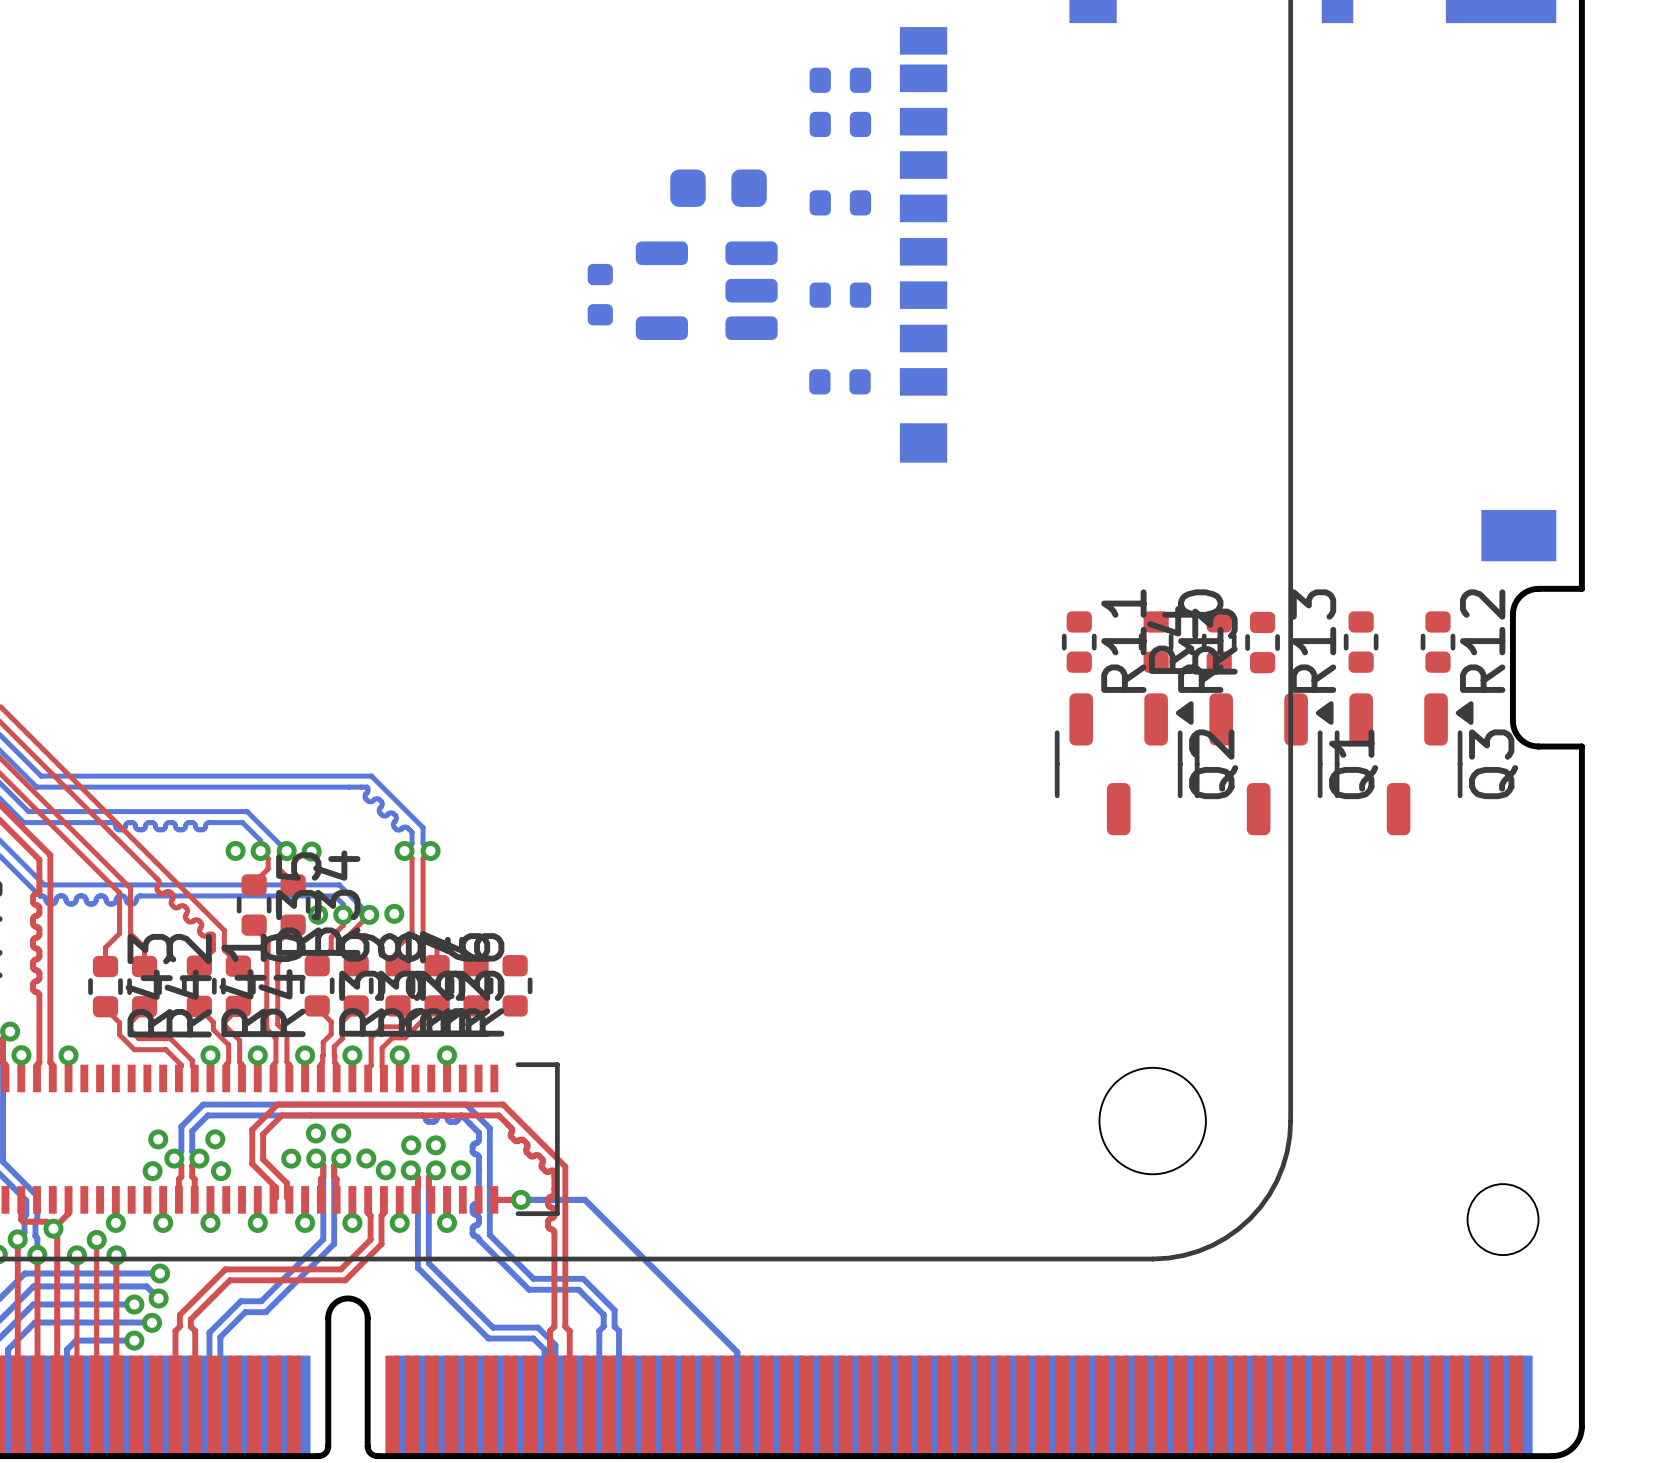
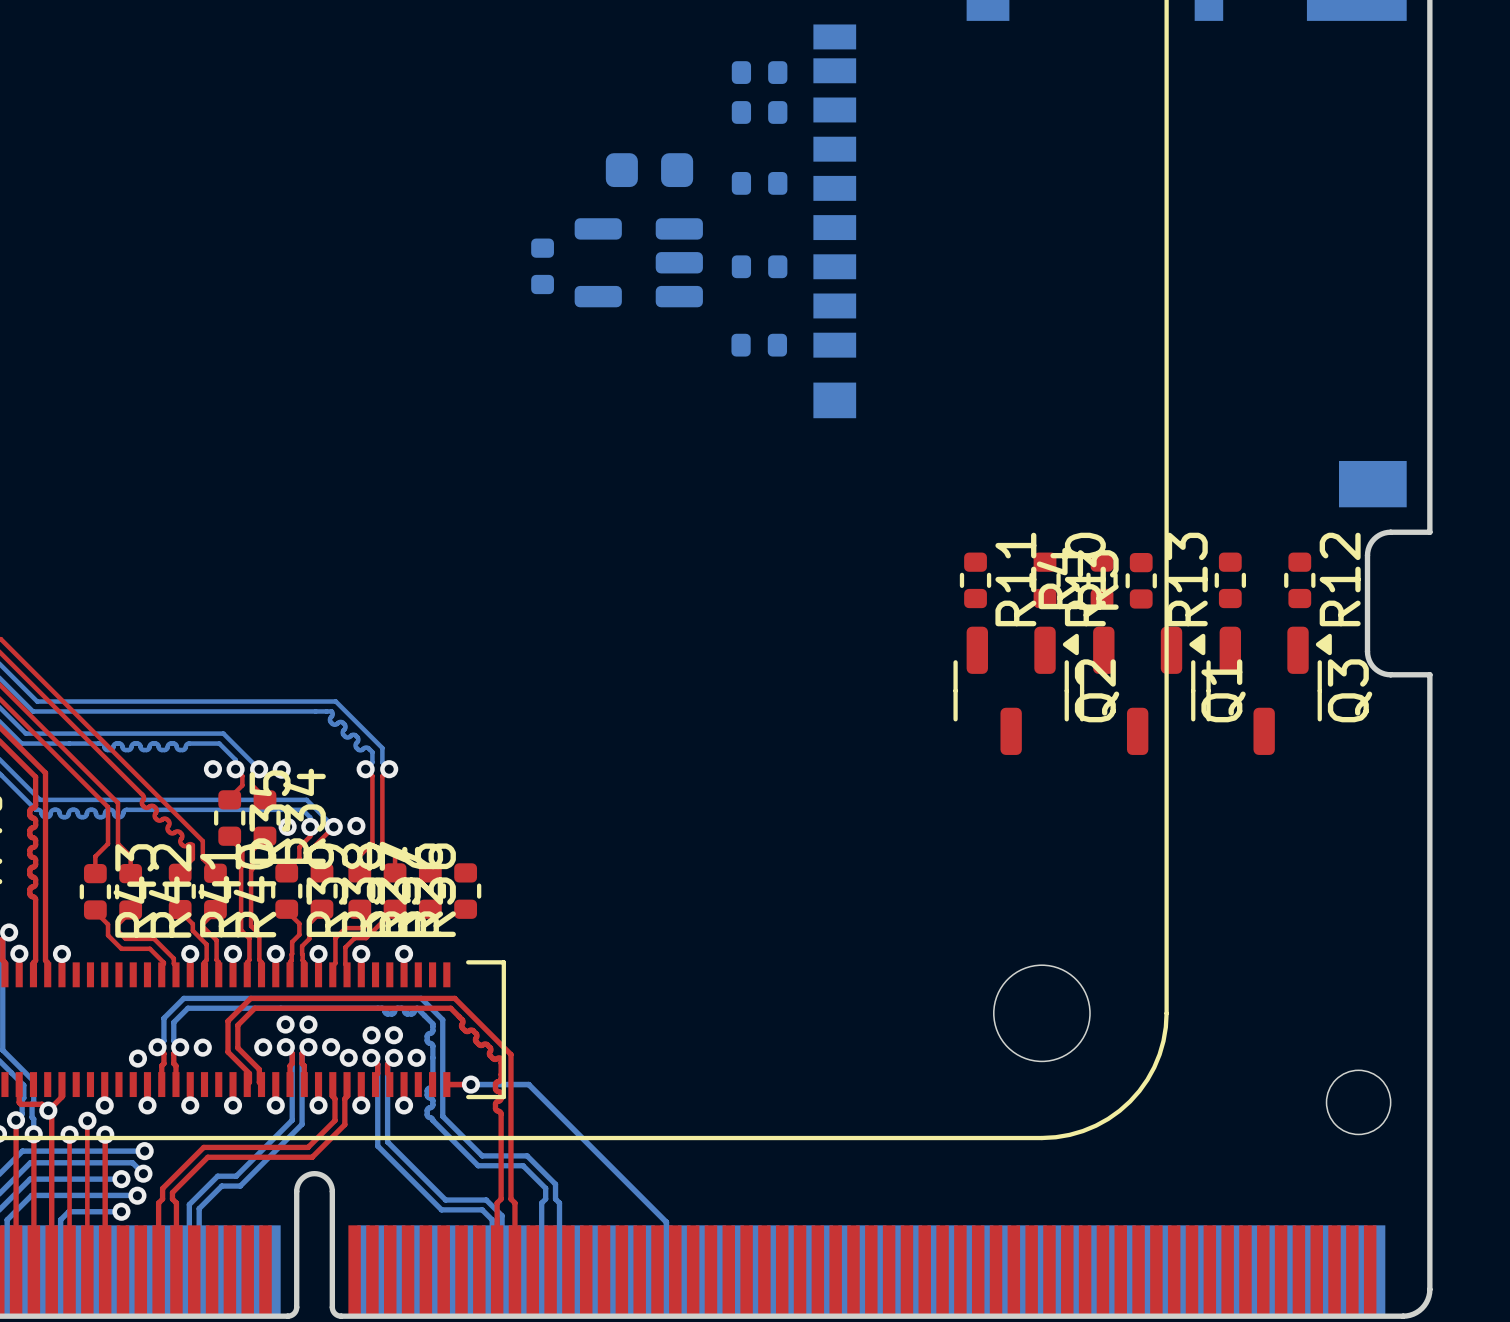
via: (158, 1139) -> none
via: (215, 1139) -> none
via: none -> (202, 1047)
via: (221, 1171) -> none

